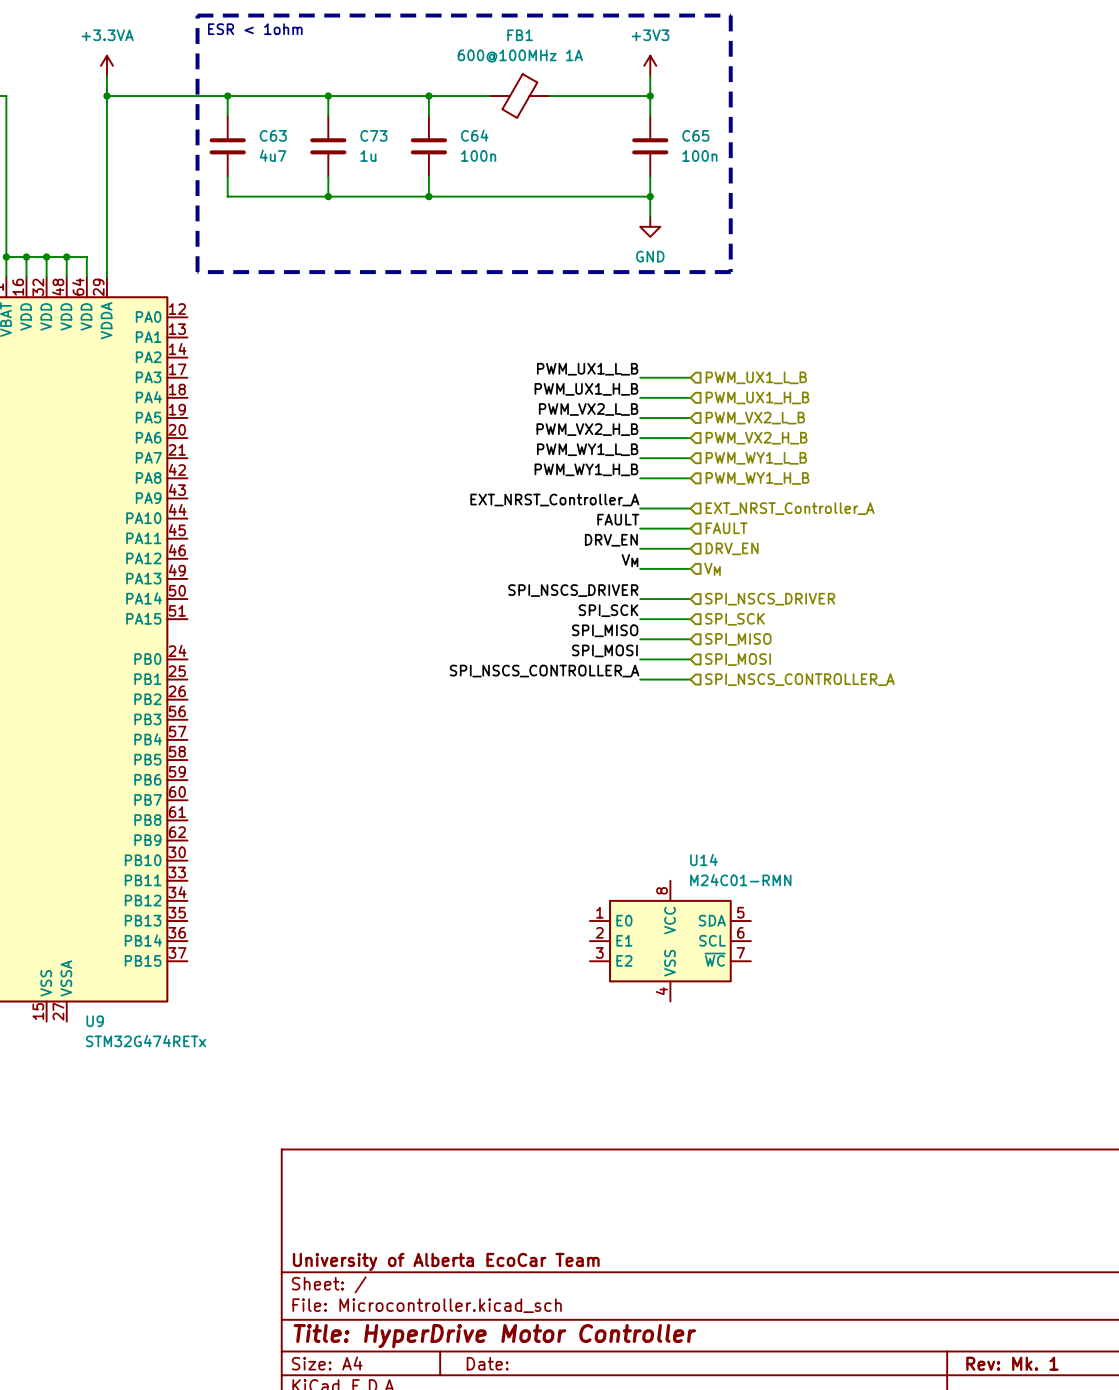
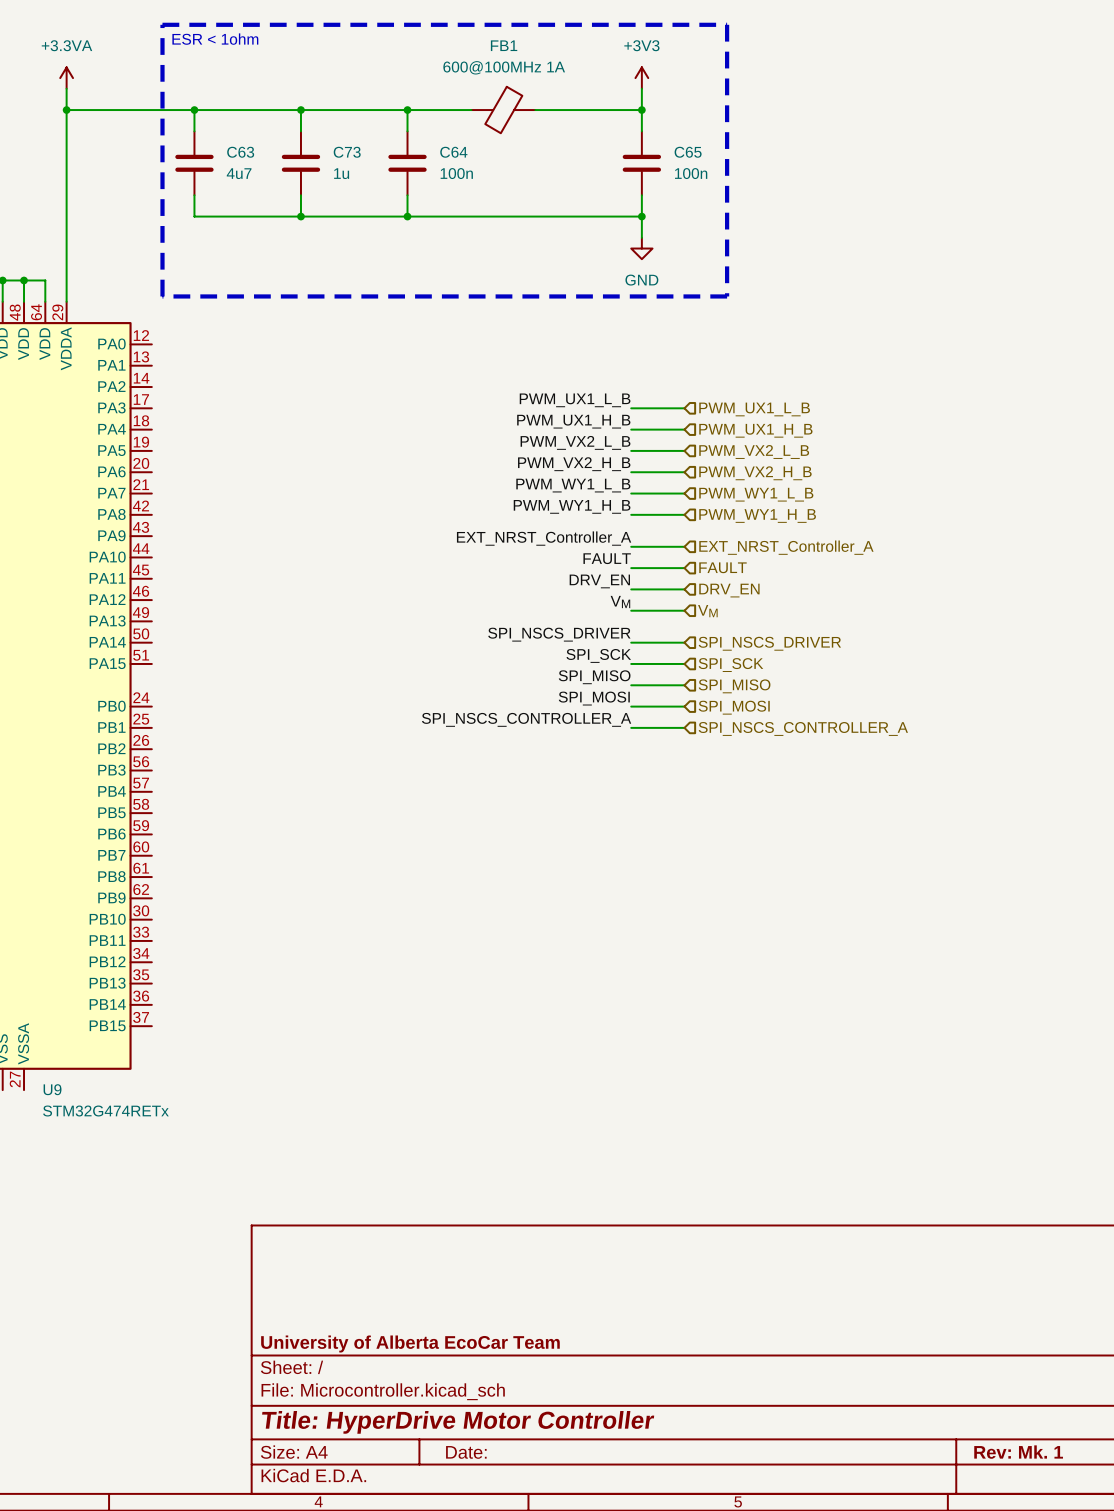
U14: M24C01-RMN (670, 941) -> none

